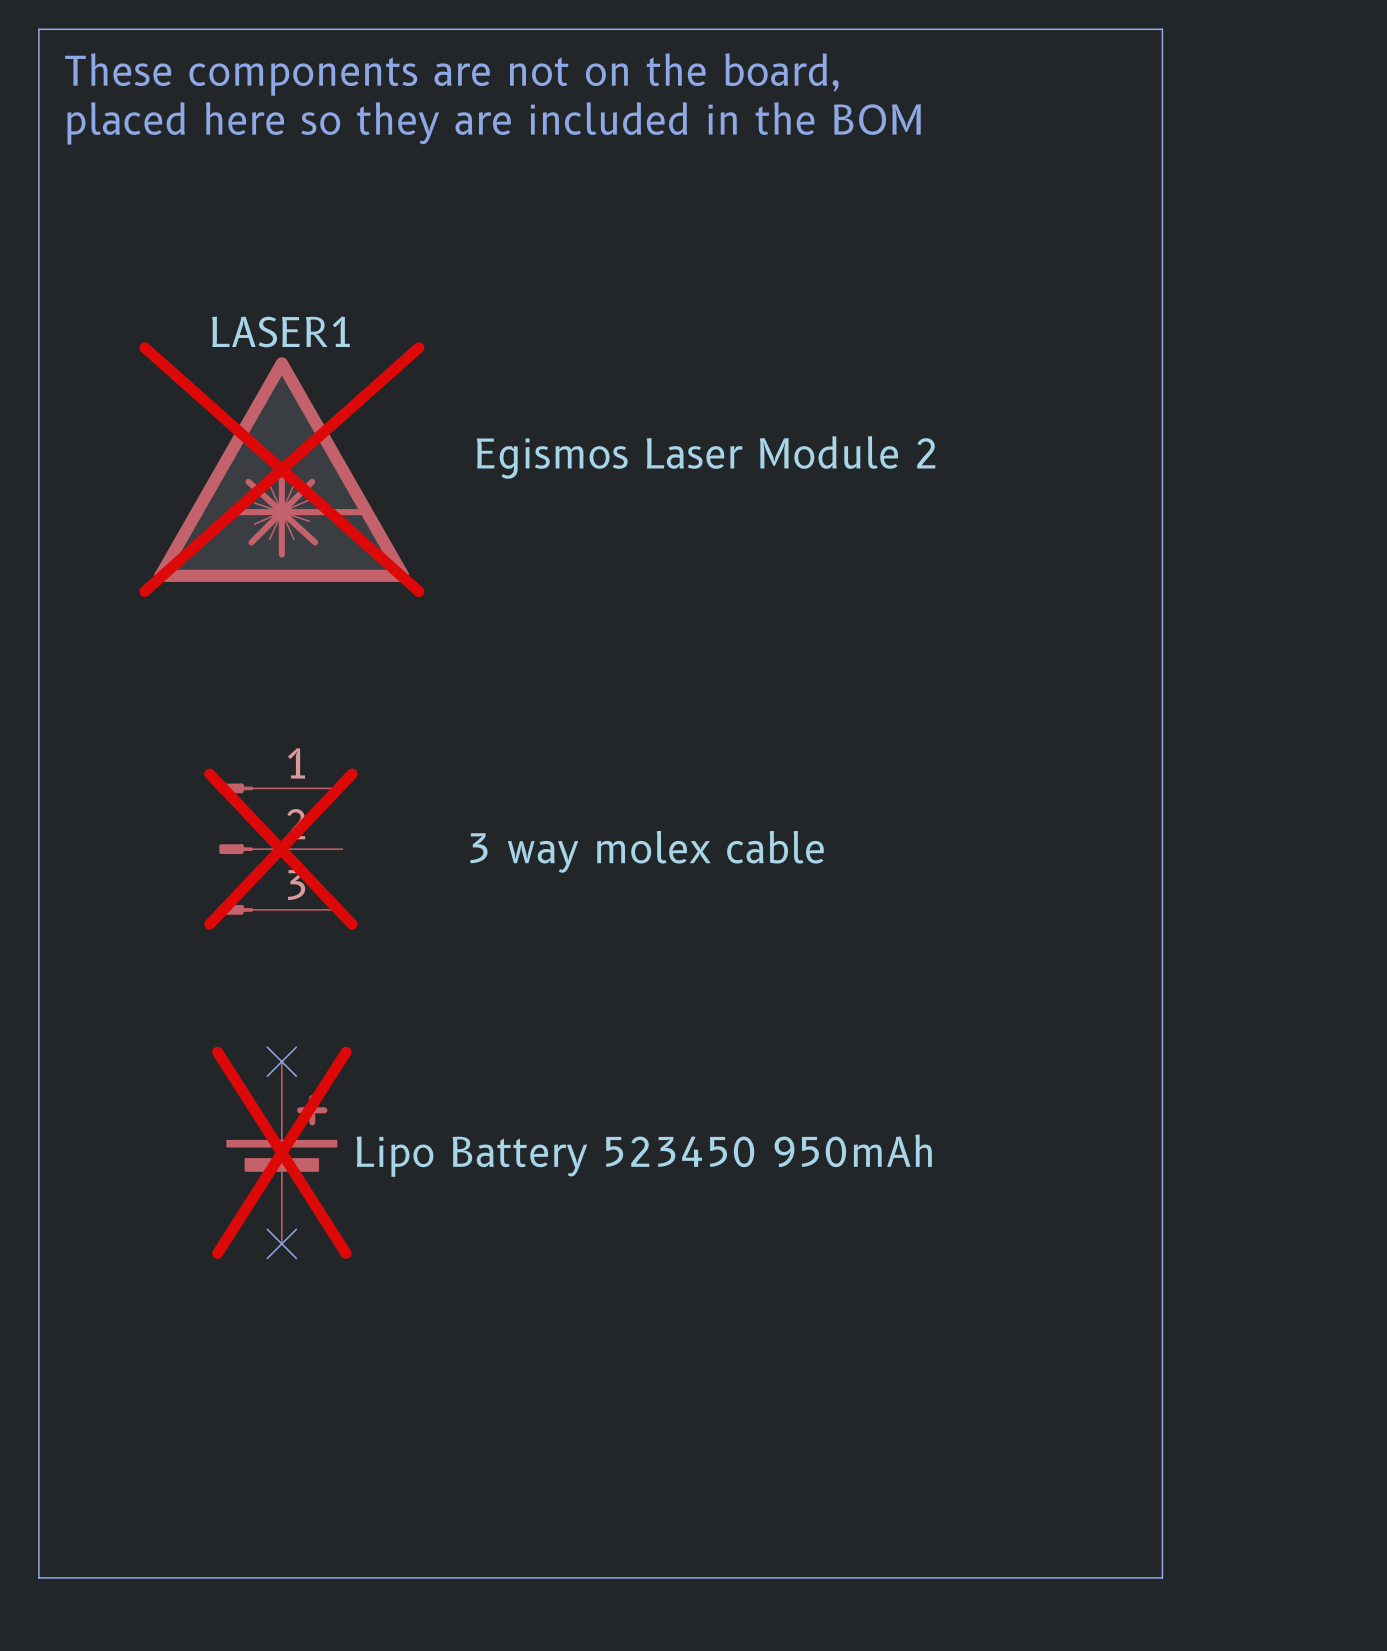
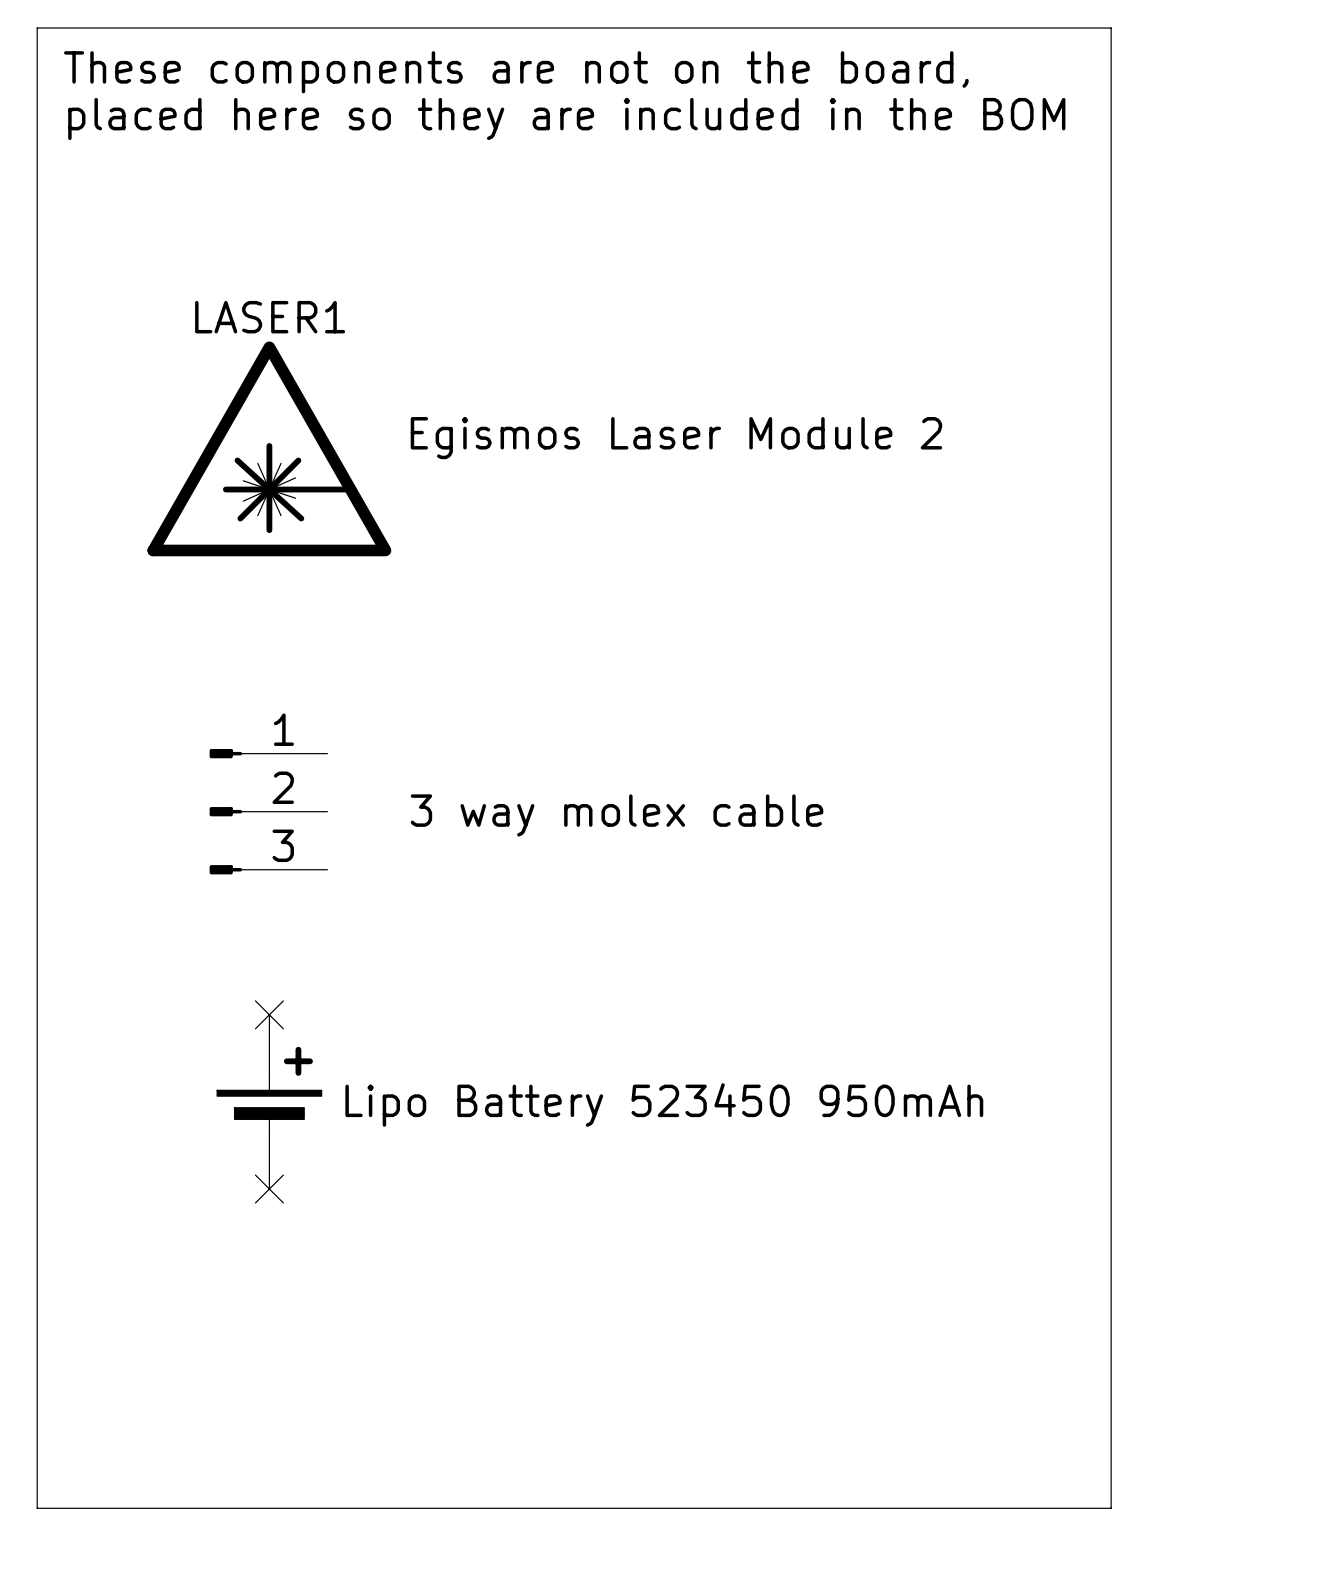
LASER1 do-not-place cross: (281, 469) -> none
part do-not-place cross: (280, 849) -> none
part do-not-place cross: (281, 1152) -> none

